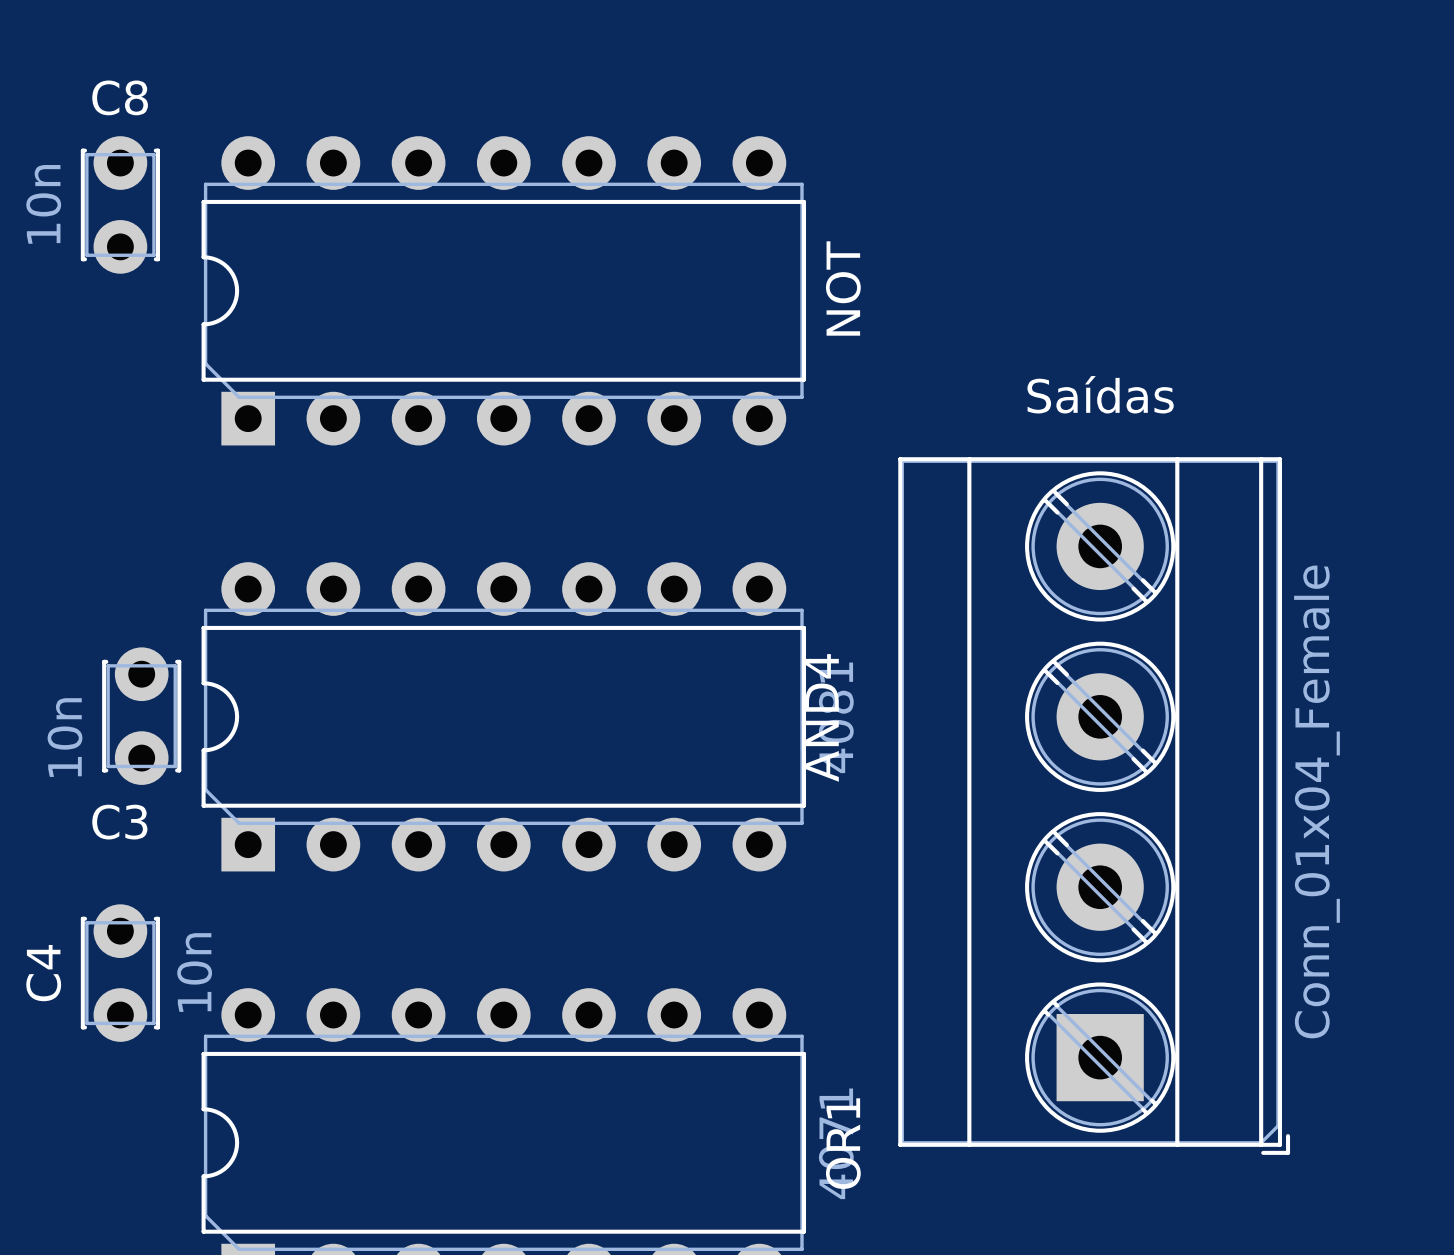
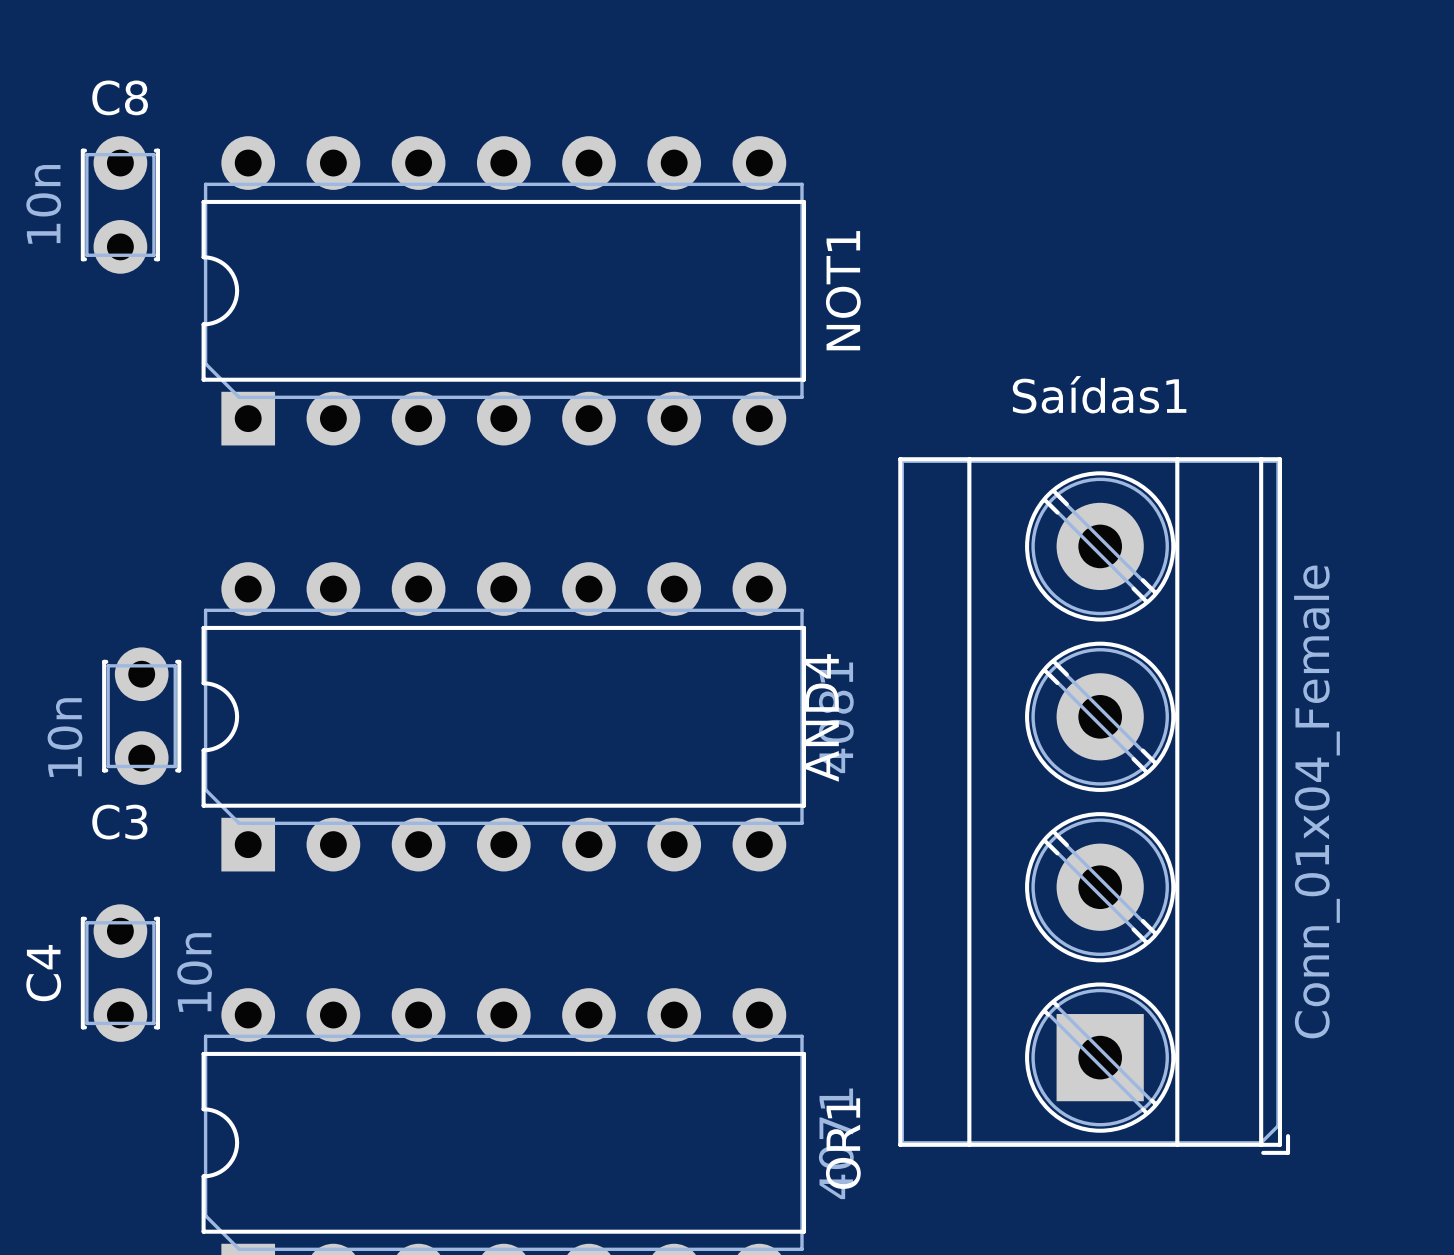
NOT name: NOT (843, 288) -> NOT1 (843, 290)
Saídas name: Saídas (1100, 394) -> Saídas1 (1099, 394)

